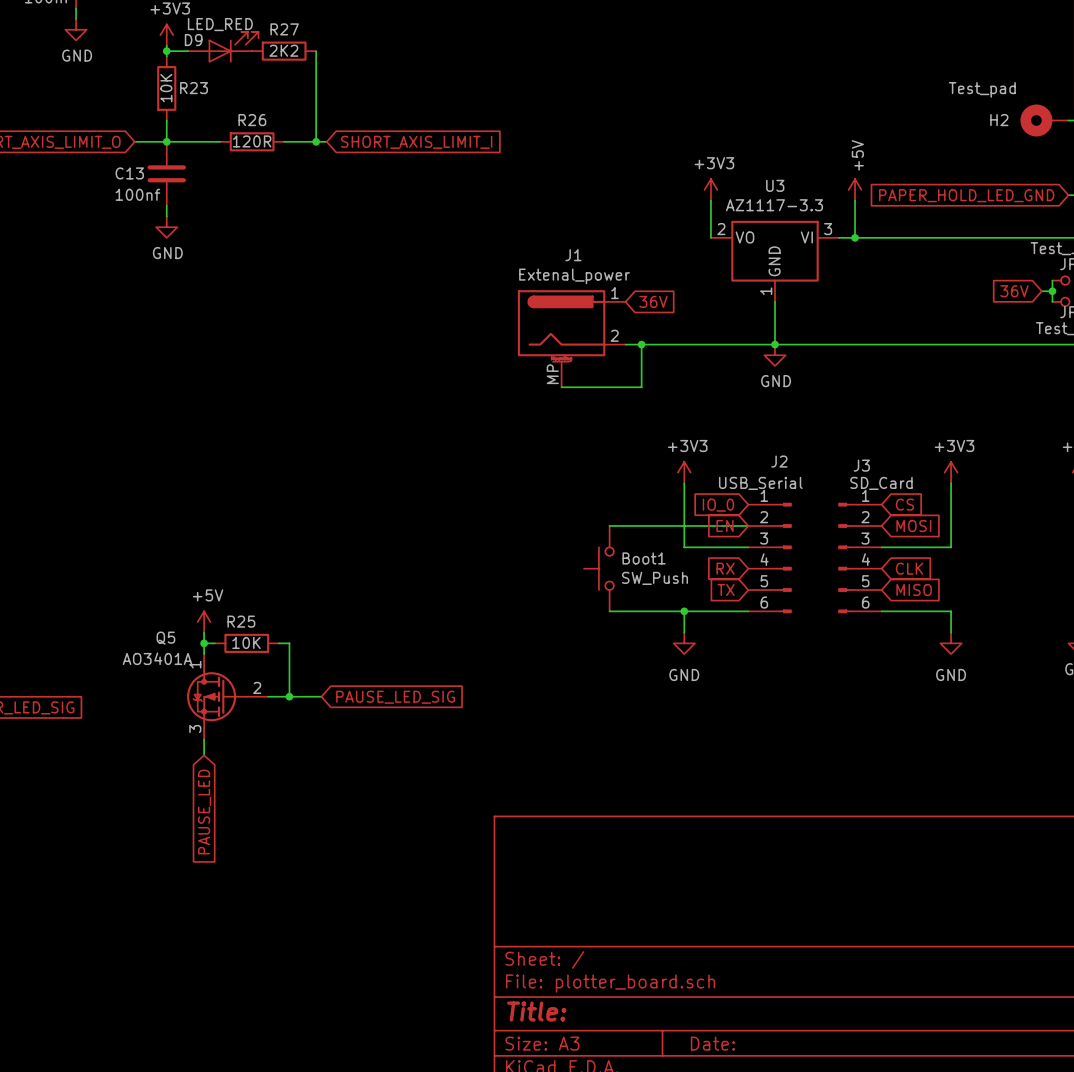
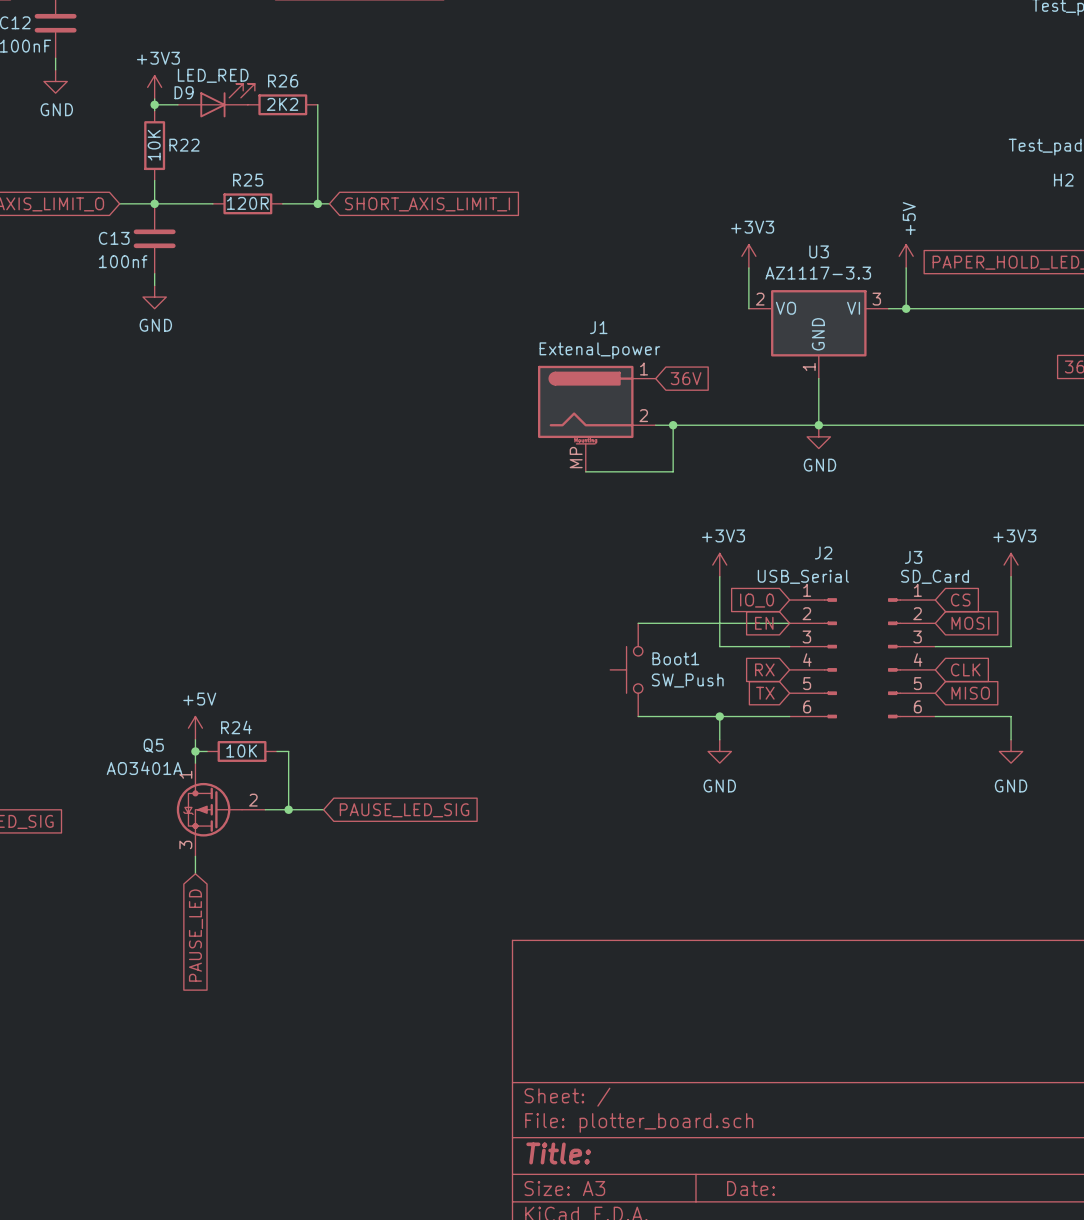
R27 name: R27 (284, 29) -> R26 (283, 81)
R23 name: R23 (194, 88) -> R22 (184, 145)
R26 name: R26 (252, 120) -> R25 (248, 180)
R25 name: R25 (241, 621) -> R24 (236, 727)

